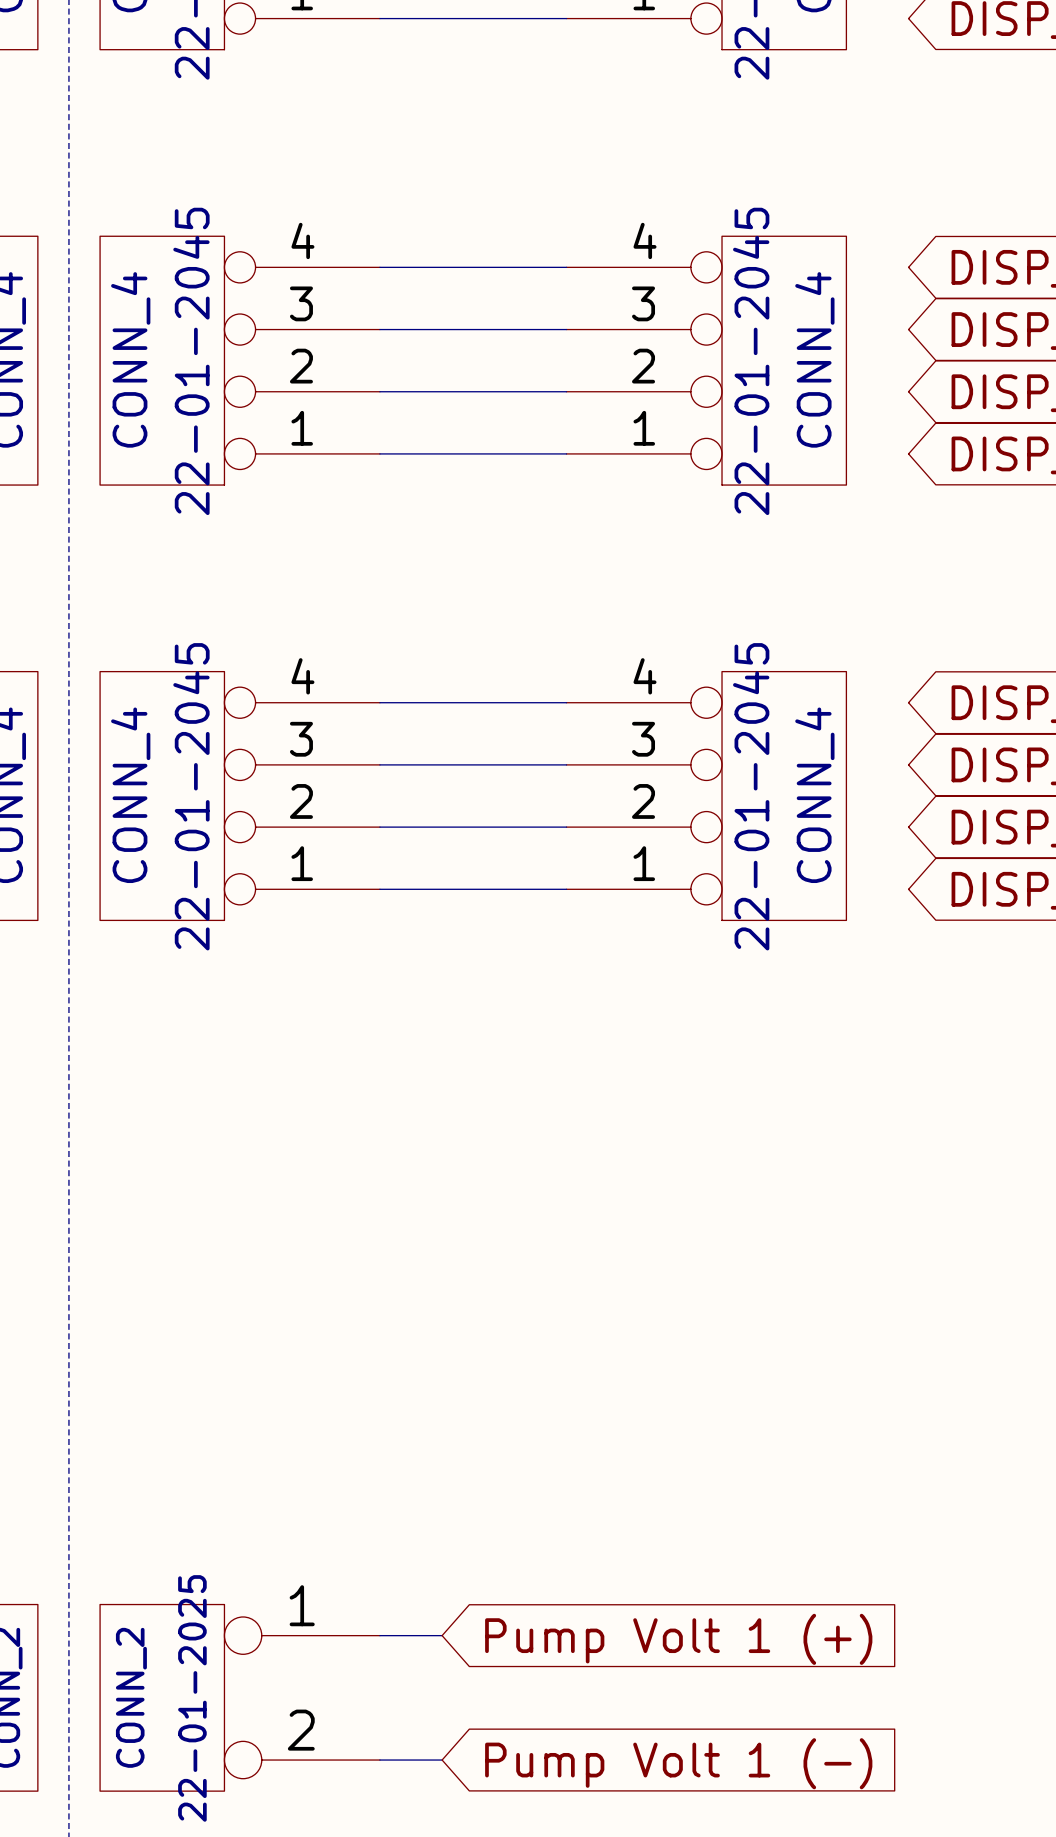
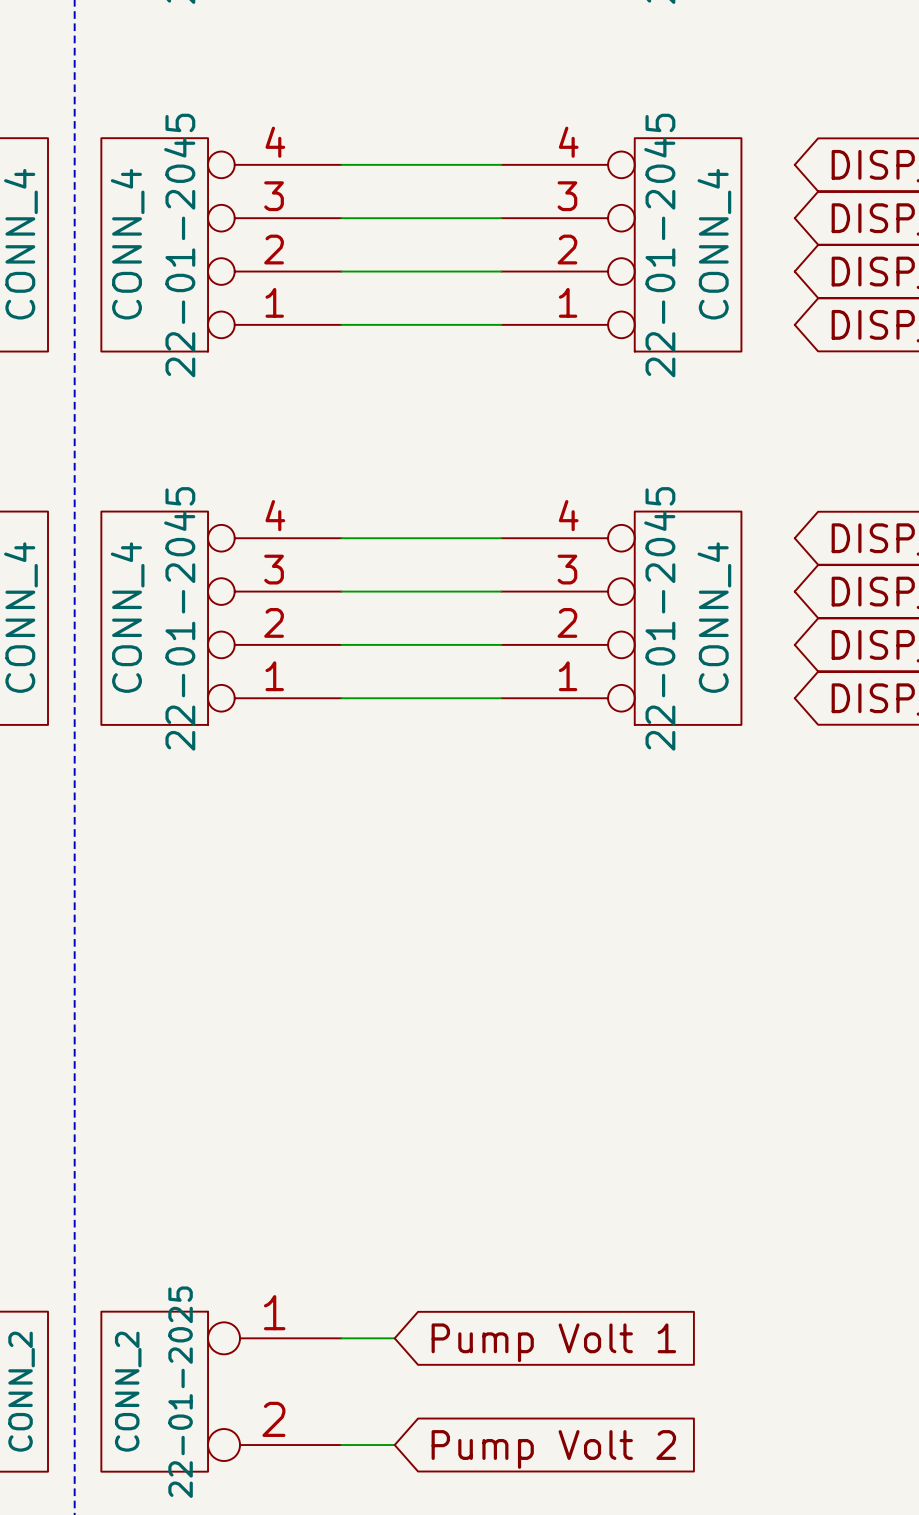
global label: Pump Volt 1 (+) (678, 1639) -> Pump Volt 1 (553, 1342)
global label: Pump Volt 1 (-) (678, 1763) -> Pump Volt 2 (553, 1449)

